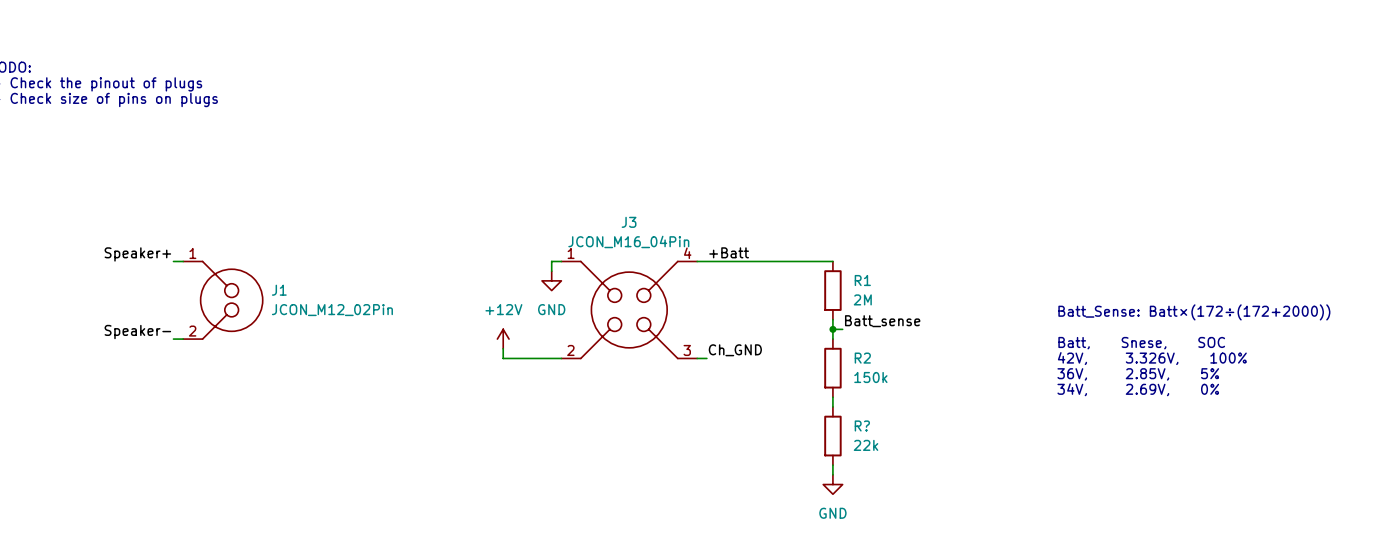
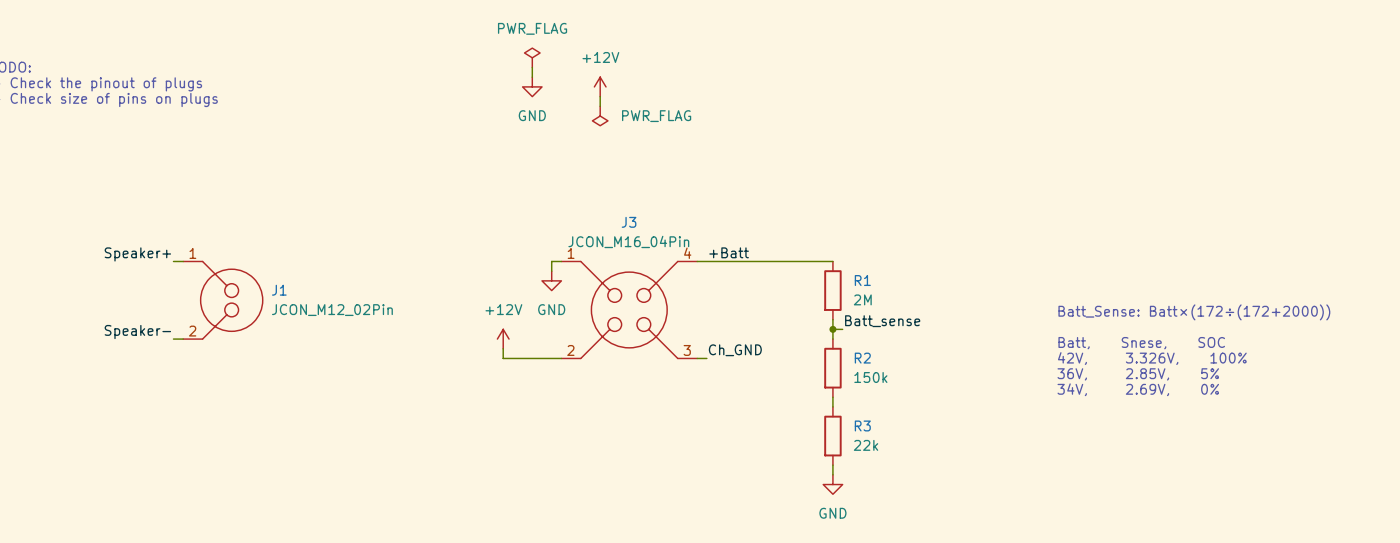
power symbol: none -> PWR_FLAG (532, 57)
wire: none -> (532, 67) (532, 77)
power symbol: none -> GND (532, 86)
power symbol: none -> +12V (600, 86)
wire: none -> (600, 96) (600, 106)
power symbol: none -> PWR_FLAG (600, 116)
R? name: R? (862, 425) -> R3 (862, 425)

